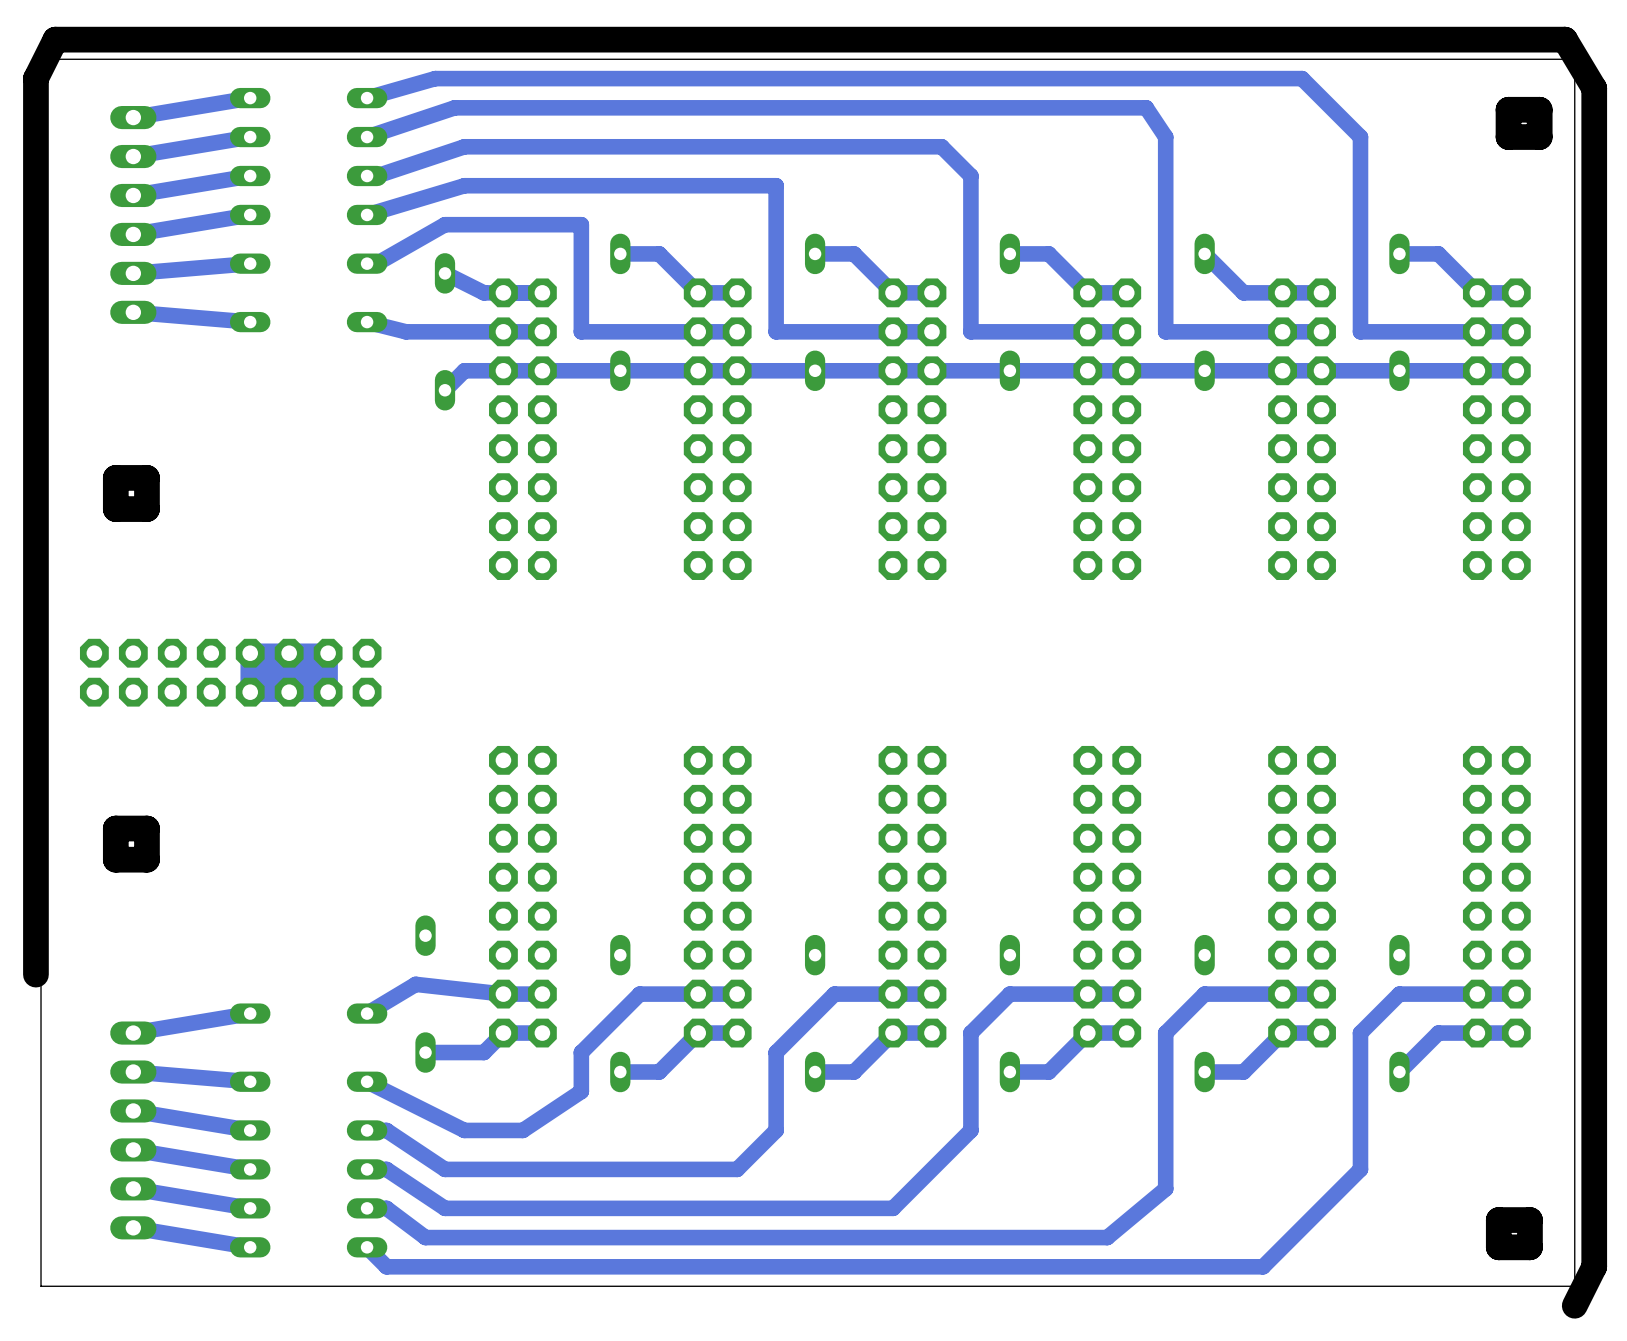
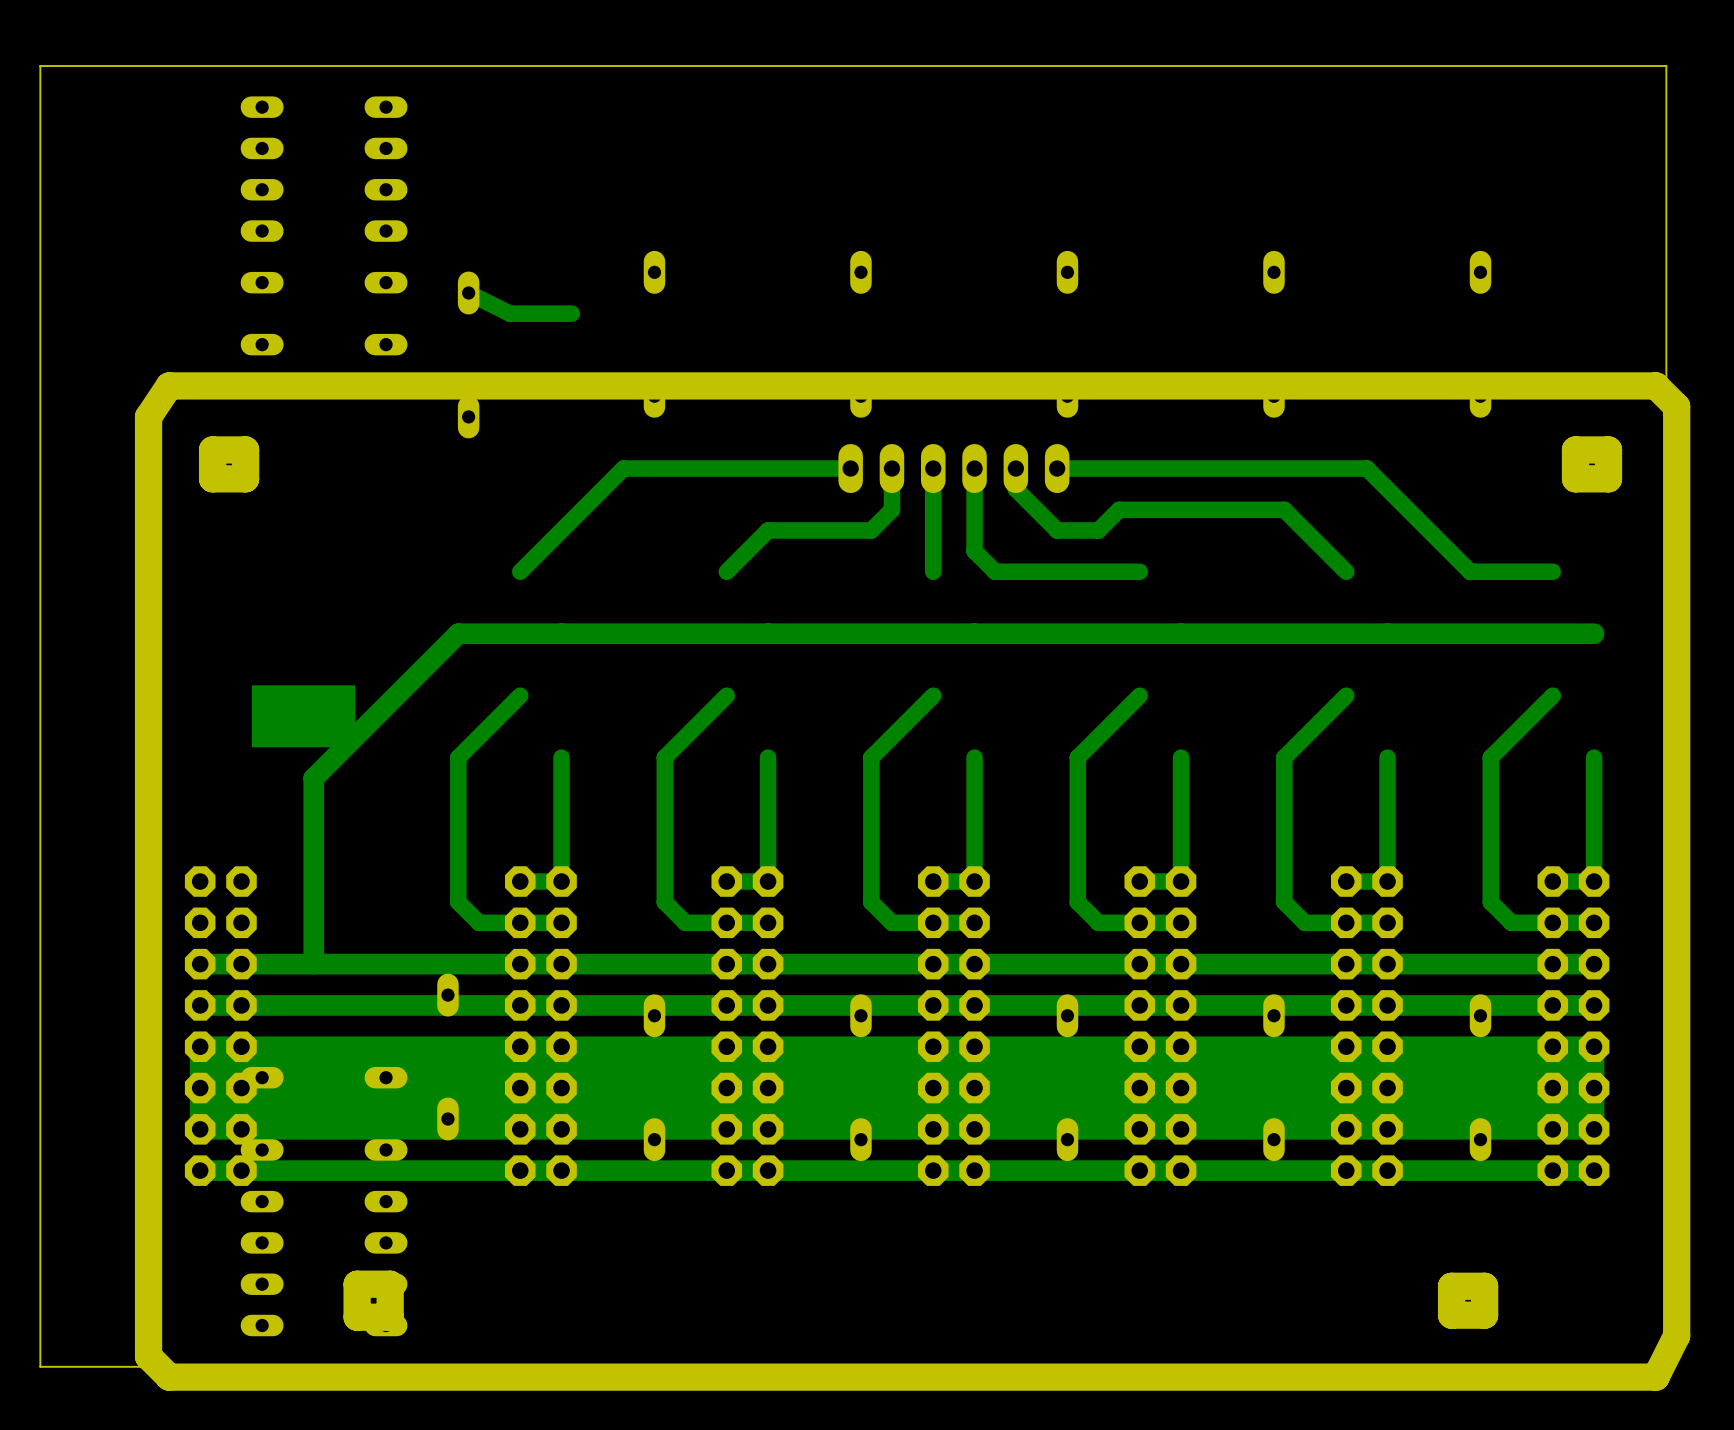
bottom track: (250, 98) (133, 117) -> none
bottom track: (367, 98) (435, 78) (1302, 78) (1360, 137) (1360, 331) (1516, 331) -> none
board edge: (1539, 109) (1508, 109) (1508, 137) (1539, 137) (1539, 109) -> (1608, 449) (1575, 449) (1575, 478) (1608, 478) (1608, 449)
bottom track: (250, 137) (133, 156) -> none
bottom track: (367, 137) (454, 107) (1146, 107) (1165, 137) (1165, 331) (1321, 331) -> none
bottom track: (250, 176) (133, 195) -> none
bottom track: (367, 176) (376, 176) (464, 146) (941, 146) (970, 176) (970, 331) (1126, 331) -> none
part: (133, 214) -> none
bottom track: (250, 214) (133, 234) -> none
bottom track: (376, 214) (367, 214) (464, 185) (776, 185) (776, 331) (931, 331) -> none
bottom track: (620, 253) (659, 253) (698, 292) (737, 292) -> none
bottom track: (815, 253) (854, 253) (893, 292) (931, 292) -> none
bottom track: (1009, 253) (1048, 253) (1087, 292) (1126, 292) -> none
bottom track: (1204, 253) (1243, 292) (1321, 292) -> none
bottom track: (1399, 253) (1438, 253) (1477, 292) (1516, 292) -> none
bottom track: (250, 263) (133, 273) -> none
bottom track: (367, 263) (376, 263) (444, 224) (581, 224) (581, 331) (737, 331) -> none
part footprint: [878, 278, 947, 580] -> [838, 444, 1070, 494]
bottom track: (133, 312) (250, 322) -> none
bottom track: (367, 322) (406, 331) (542, 331) -> none
board edge: none -> (1656, 385) (169, 385) (148, 416) (148, 1356) (169, 1377) (1656, 1377) (1676, 1335) (1676, 406) (1656, 385)
bottom track: (1516, 370) (464, 370) (444, 390) -> none
board edge: none -> (245, 449) (212, 449) (212, 478) (245, 478) (245, 449)
part: (522, 429) -> none
part: (717, 429) -> none
part: (1107, 429) -> none
part: (1302, 429) -> none
part: (1496, 429) -> none
bottom track: none -> (850, 468) (623, 468) (520, 571)
bottom track: none -> (891, 468) (891, 509) (871, 530) (768, 530) (726, 571)
bottom track: none -> (933, 468) (933, 571)
bottom track: none -> (974, 468) (974, 551) (995, 571) (1139, 571)
bottom track: none -> (1015, 468) (1015, 489) (1057, 530) (1098, 530) (1119, 509) (1284, 509) (1346, 571)
bottom track: none -> (1057, 468) (1366, 468) (1470, 571) (1552, 571)
board edge: (146, 477) (146, 509) (115, 509) (115, 477) (146, 477) -> none
bottom track: none -> (1594, 633) (458, 633) (313, 778) (313, 964) (241, 964)
bottom track: none -> (520, 695) (458, 757) (458, 902) (478, 922) (561, 922)
bottom track: none -> (726, 695) (664, 757) (664, 902) (685, 922) (768, 922)
bottom track: none -> (933, 695) (871, 757) (871, 902) (891, 922) (974, 922)
bottom track: none -> (1139, 695) (1077, 757) (1077, 902) (1098, 922) (1181, 922)
bottom track: none -> (1346, 695) (1284, 757) (1284, 902) (1304, 922) (1387, 922)
bottom track: none -> (1552, 695) (1490, 757) (1490, 902) (1511, 922) (1594, 922)
part: (230, 672) -> none
bottom track: none -> (561, 757) (561, 881) (520, 881)
bottom track: none -> (768, 757) (768, 881) (726, 881)
bottom track: none -> (974, 757) (974, 881) (933, 881)
bottom track: none -> (1181, 757) (1181, 881) (1139, 881)
bottom track: none -> (1387, 757) (1387, 881) (1346, 881)
bottom track: none -> (1594, 757) (1594, 881) (1552, 881)
board edge: (146, 828) (146, 859) (115, 859) (115, 828) (146, 828) -> none
drawing: none -> [189, 953, 1605, 975]
part position: (522, 896) -> (540, 1026)
part position: (717, 896) -> (747, 1026)
part position: (912, 896) -> (953, 1026)
part position: (1107, 896) -> (1160, 1026)
part position: (1302, 896) -> (1366, 1026)
part position: (1496, 896) -> (1573, 1026)
drawing: none -> [189, 995, 1605, 1016]
part: none -> (220, 1026)
board edge: (35, 974) (35, 78) (55, 39) (1565, 39) (1594, 88) (1594, 1266) (1574, 1305) -> none
drawing: none -> [189, 1036, 1605, 1140]
bottom track: (542, 994) (503, 994) (415, 984) (367, 1013) -> none
bottom track: (737, 994) (639, 994) (581, 1052) (581, 1091) (522, 1130) (464, 1130) (367, 1081) -> none
bottom track: (931, 994) (834, 994) (776, 1052) (776, 1130) (737, 1169) (444, 1169) (386, 1130) (367, 1130) -> none
bottom track: (1126, 994) (1009, 994) (970, 1033) (970, 1130) (893, 1208) (444, 1208) (386, 1169) (367, 1169) -> none
bottom track: (1321, 994) (1204, 994) (1165, 1033) (1165, 1188) (1107, 1237) (425, 1237) (386, 1208) (367, 1208) -> none
bottom track: (1516, 994) (1399, 994) (1360, 1033) (1360, 1169) (1263, 1266) (386, 1266) (367, 1247) -> none
bottom track: (250, 1013) (133, 1033) -> none
bottom track: (542, 1033) (503, 1033) (483, 1052) (425, 1052) -> none
bottom track: (737, 1033) (698, 1033) (659, 1072) (620, 1072) -> none
bottom track: (931, 1033) (893, 1033) (854, 1072) (815, 1072) -> none
bottom track: (1126, 1033) (1087, 1033) (1048, 1072) (1009, 1072) -> none
bottom track: (1321, 1033) (1282, 1033) (1243, 1072) (1204, 1072) -> none
bottom track: (1516, 1033) (1438, 1033) (1399, 1072) -> none
bottom track: (133, 1072) (250, 1081) -> none
drawing: none -> [189, 1160, 1605, 1181]
bottom track: (133, 1110) (250, 1130) -> none
part: (133, 1130) -> none
bottom track: (133, 1149) (250, 1169) -> none
bottom track: (133, 1188) (250, 1208) -> none
board edge: none -> (390, 1284) (390, 1317) (357, 1317) (357, 1284) (390, 1284)
board edge: (1529, 1220) (1498, 1220) (1498, 1247) (1529, 1247) (1529, 1220) -> (1484, 1286) (1451, 1286) (1451, 1315) (1484, 1315) (1484, 1286)
bottom track: (133, 1227) (250, 1247) -> none

